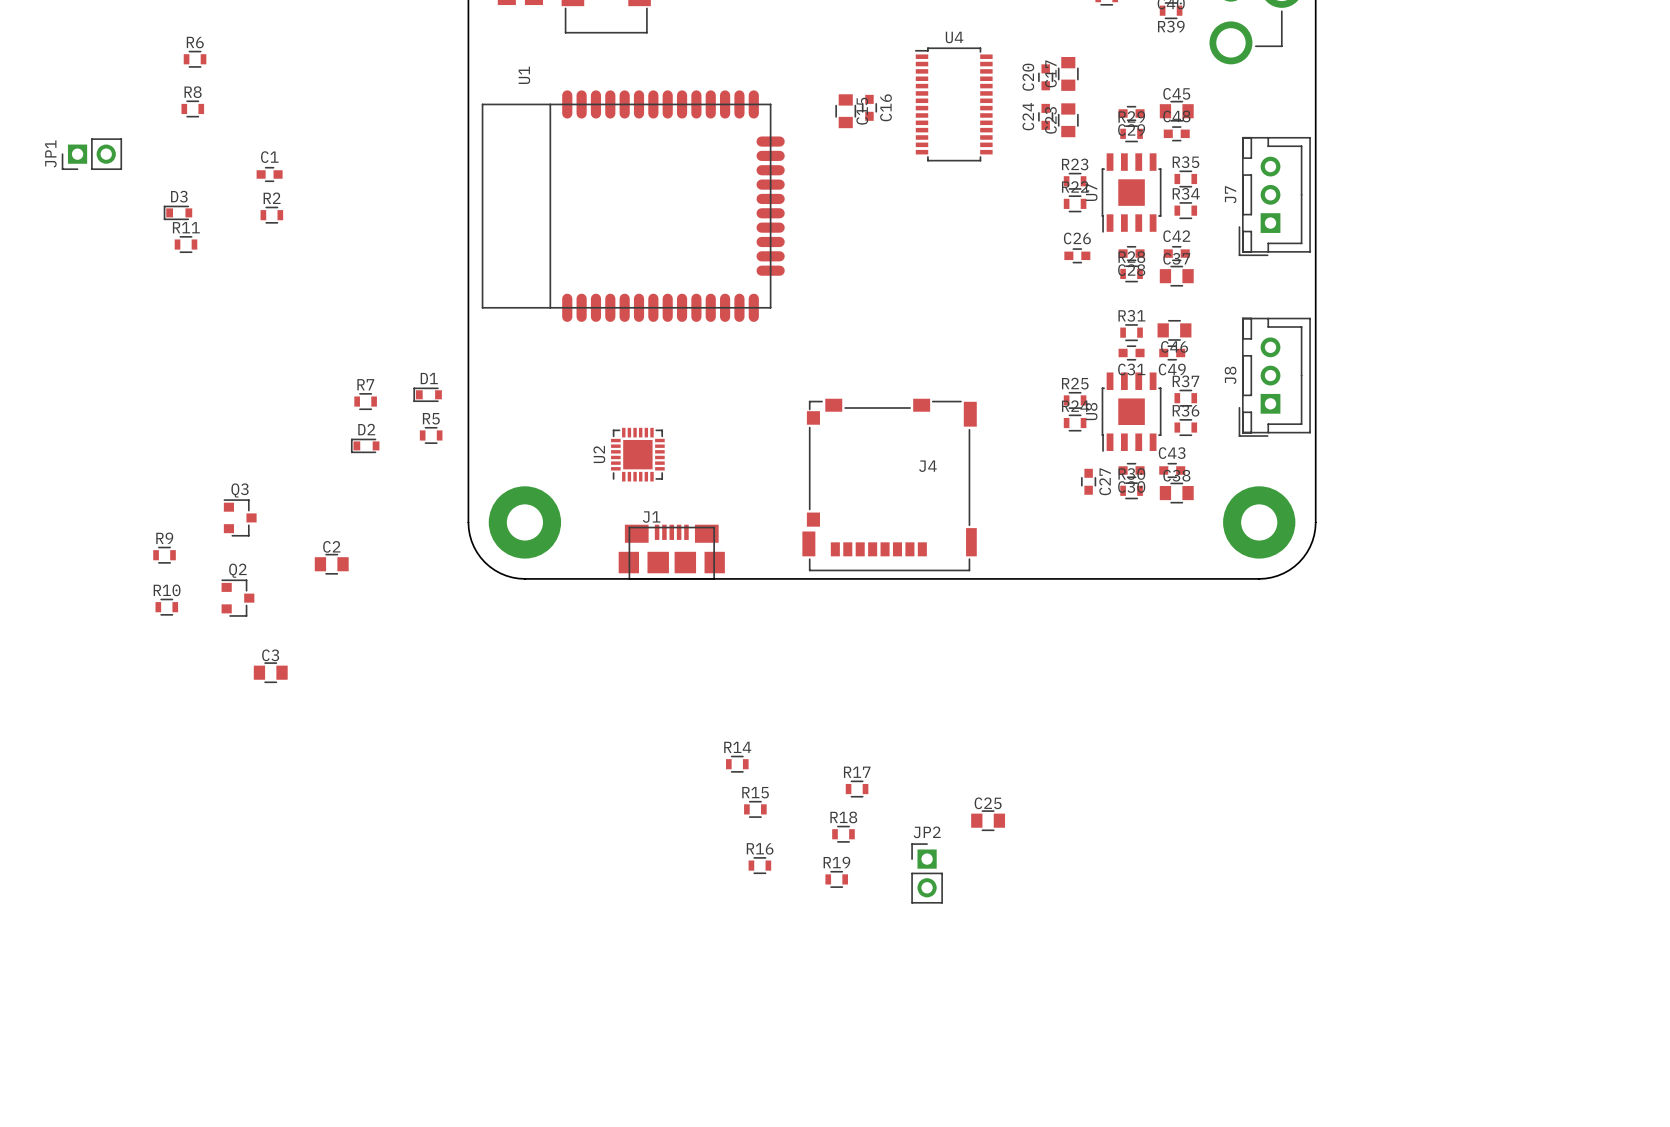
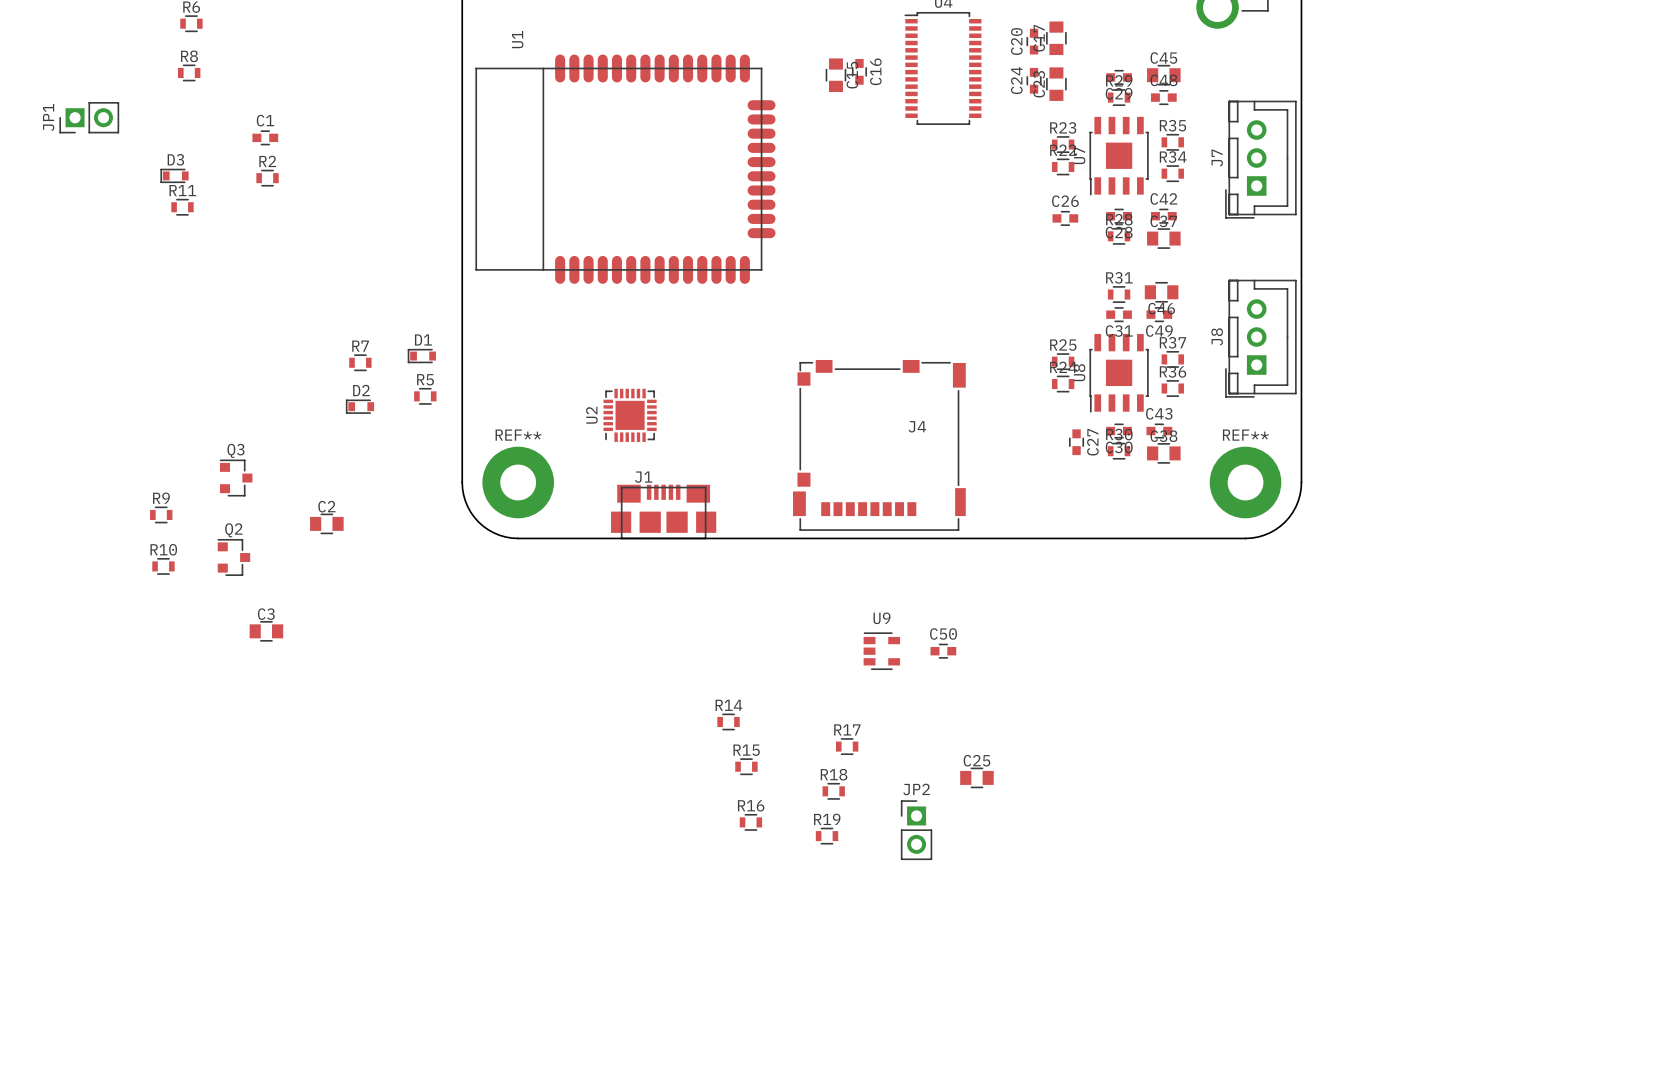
REF** name: none -> REF** (518, 435)
REF** name: none -> REF** (1245, 435)
U9: none -> (881, 651)
C50: none -> (943, 651)

